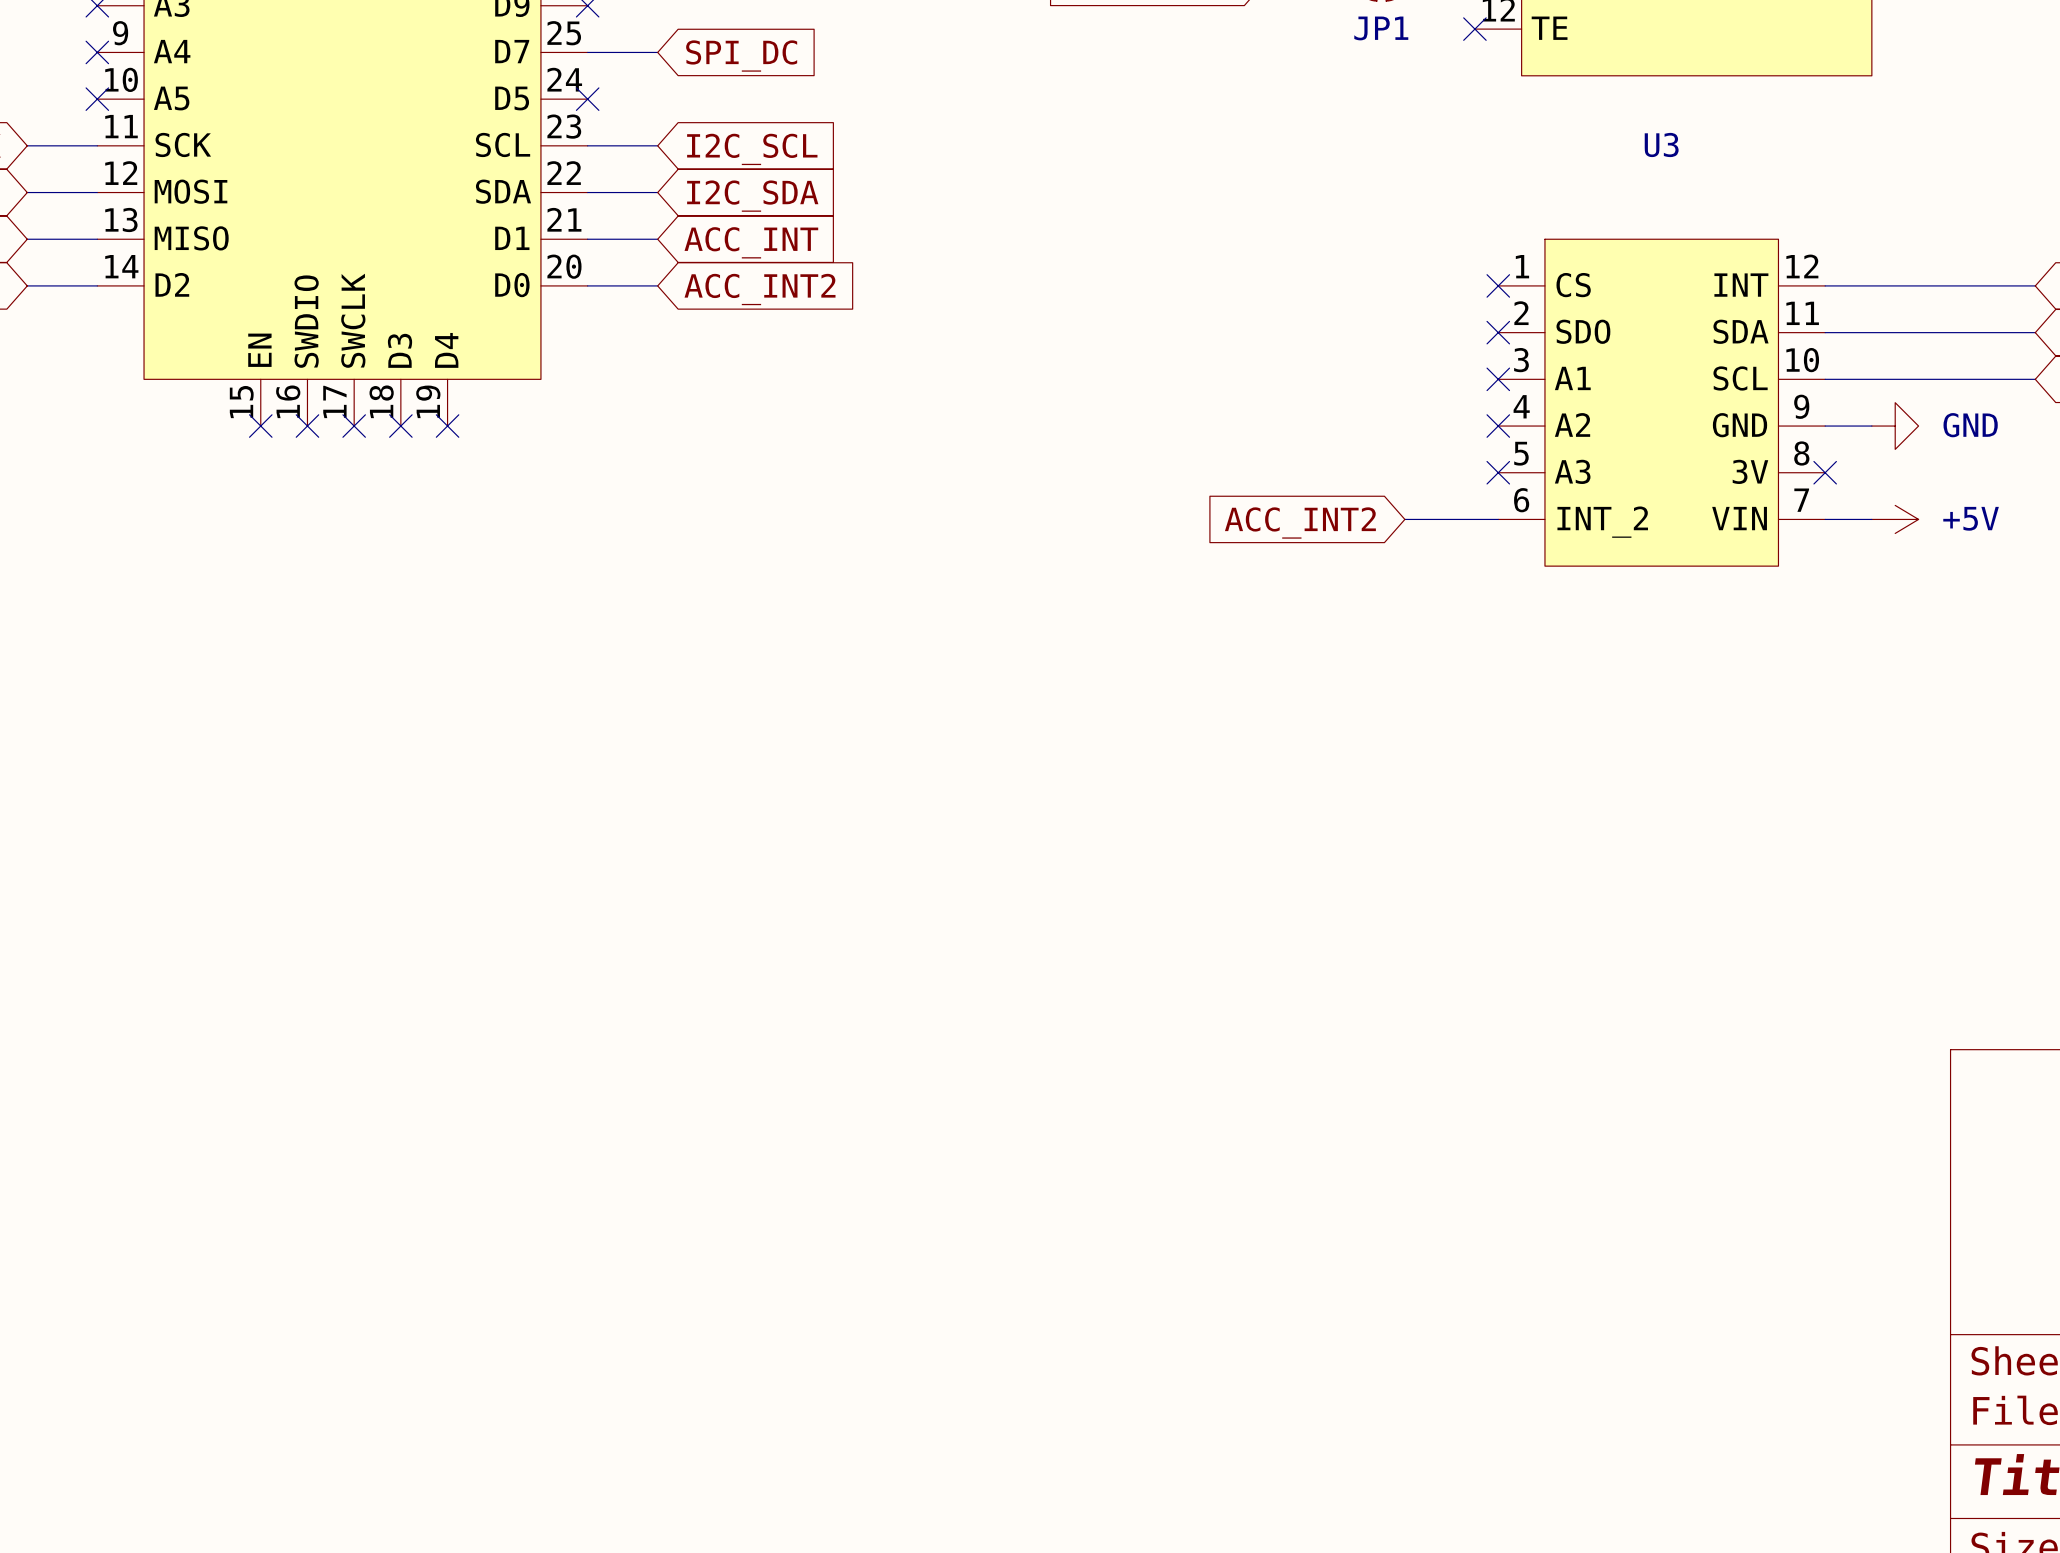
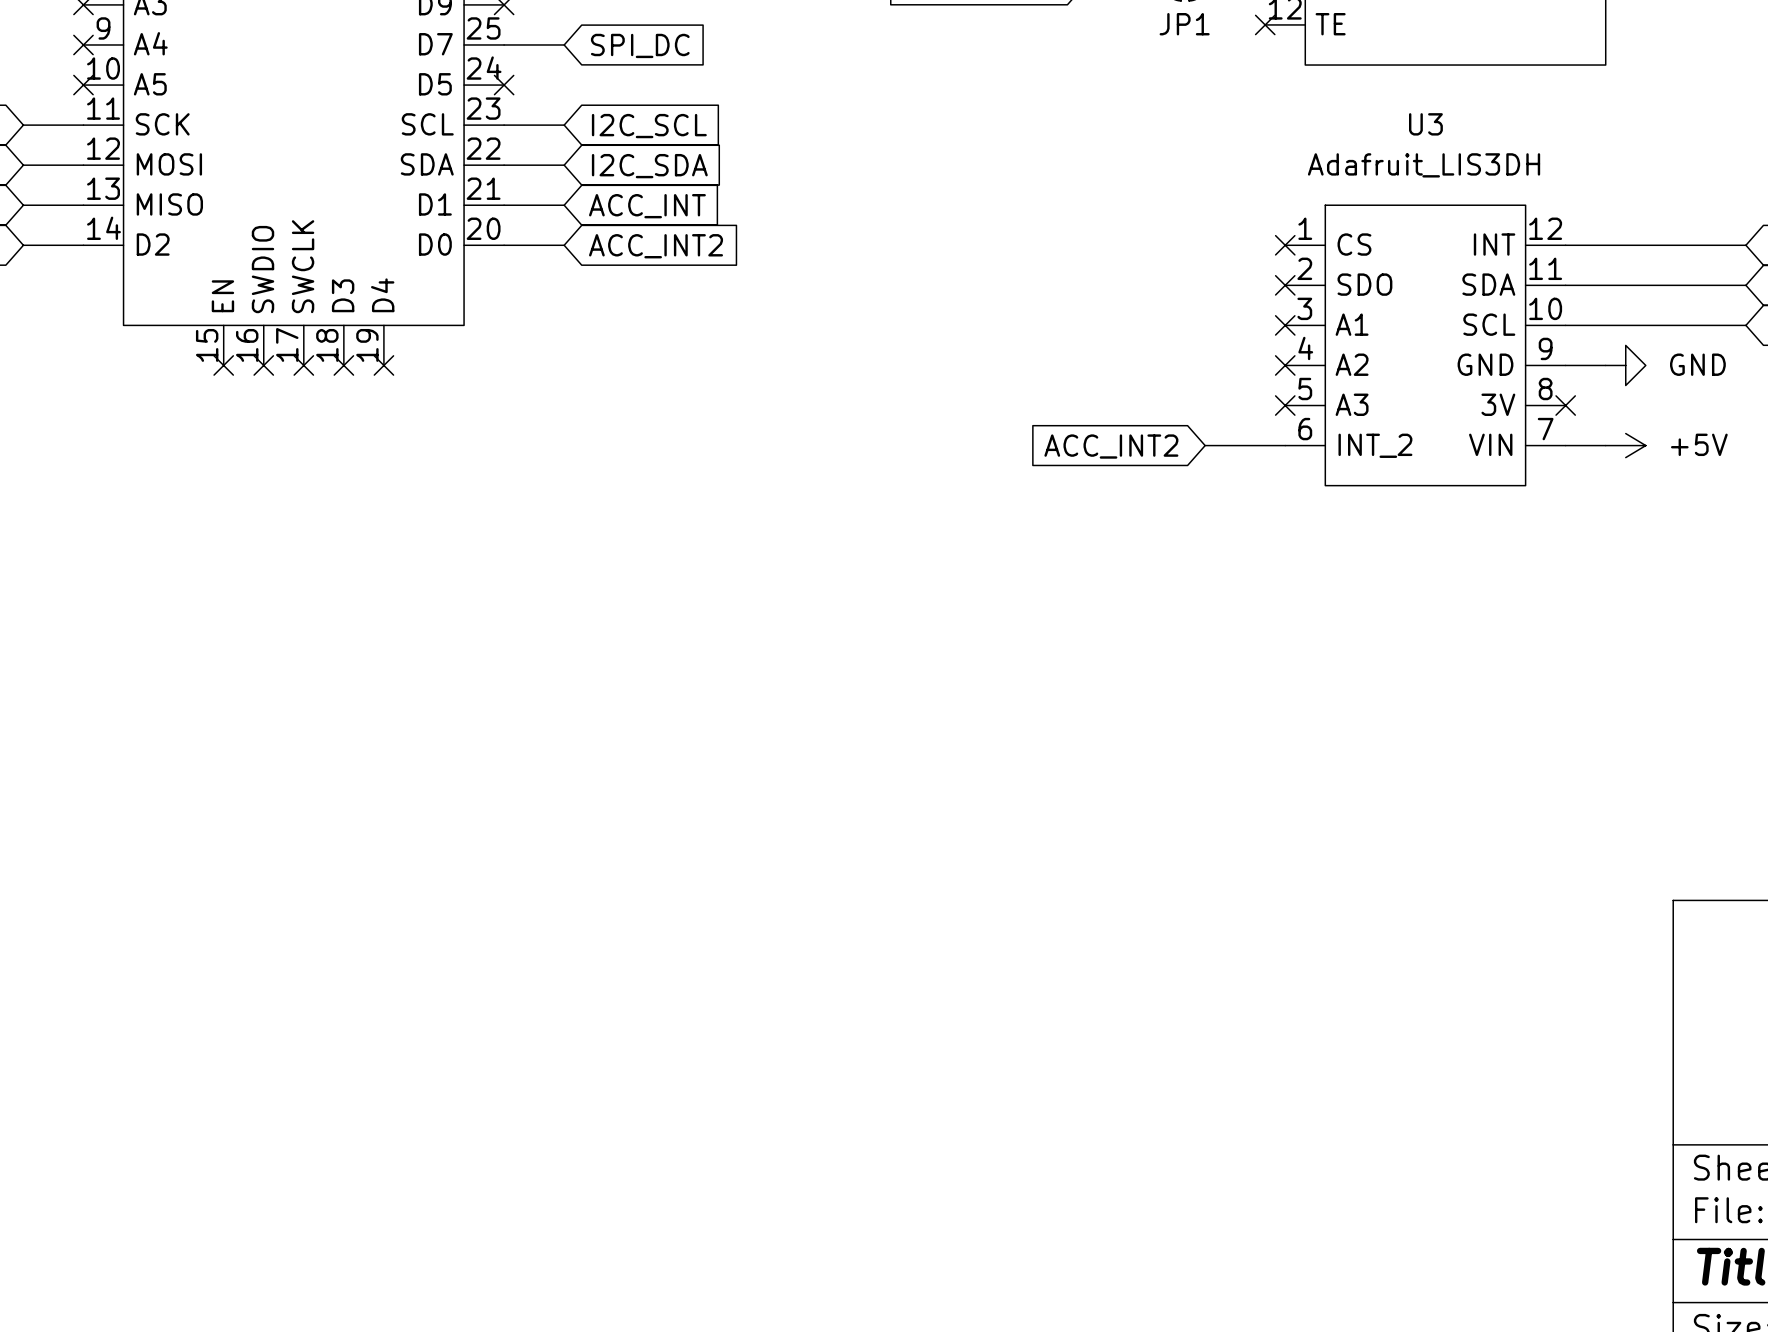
U3 value: none -> Adafruit_LIS3DH (1424, 165)

